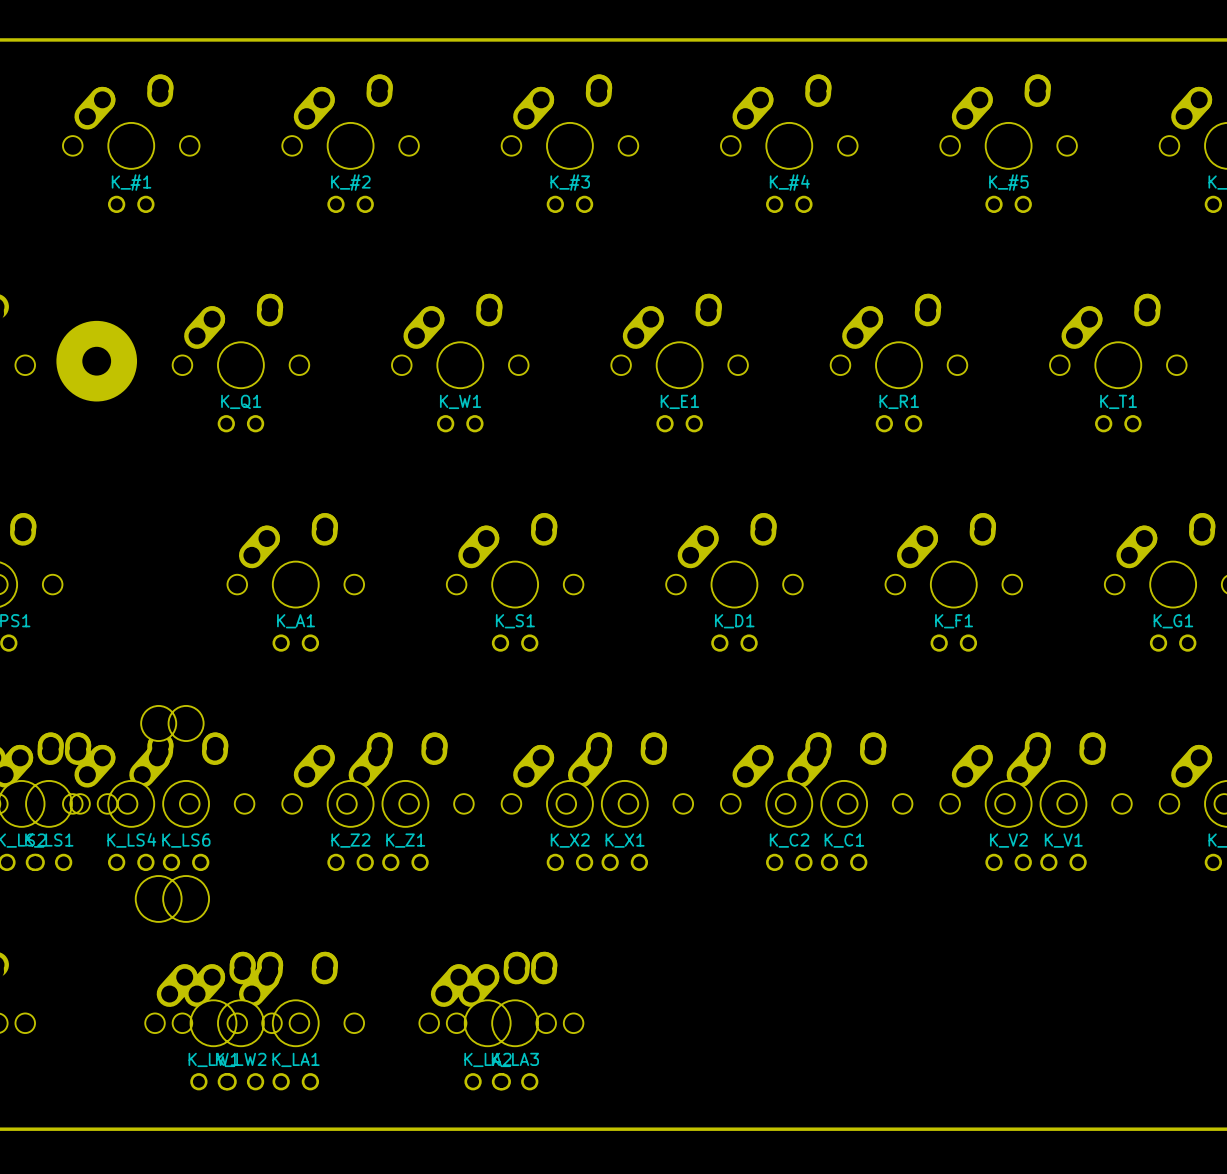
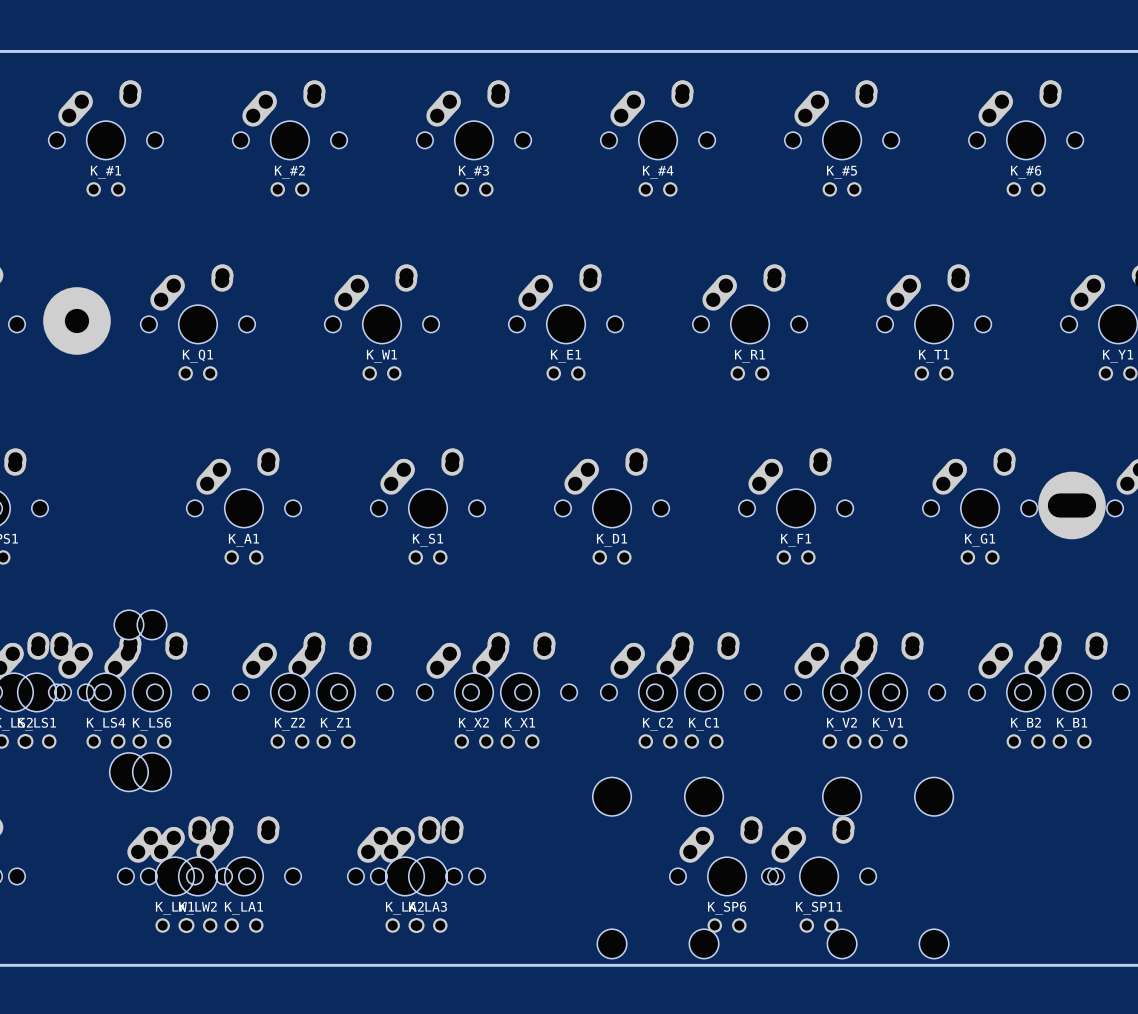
K_SP6: none -> (727, 868)
K_SP11: none -> (819, 868)

